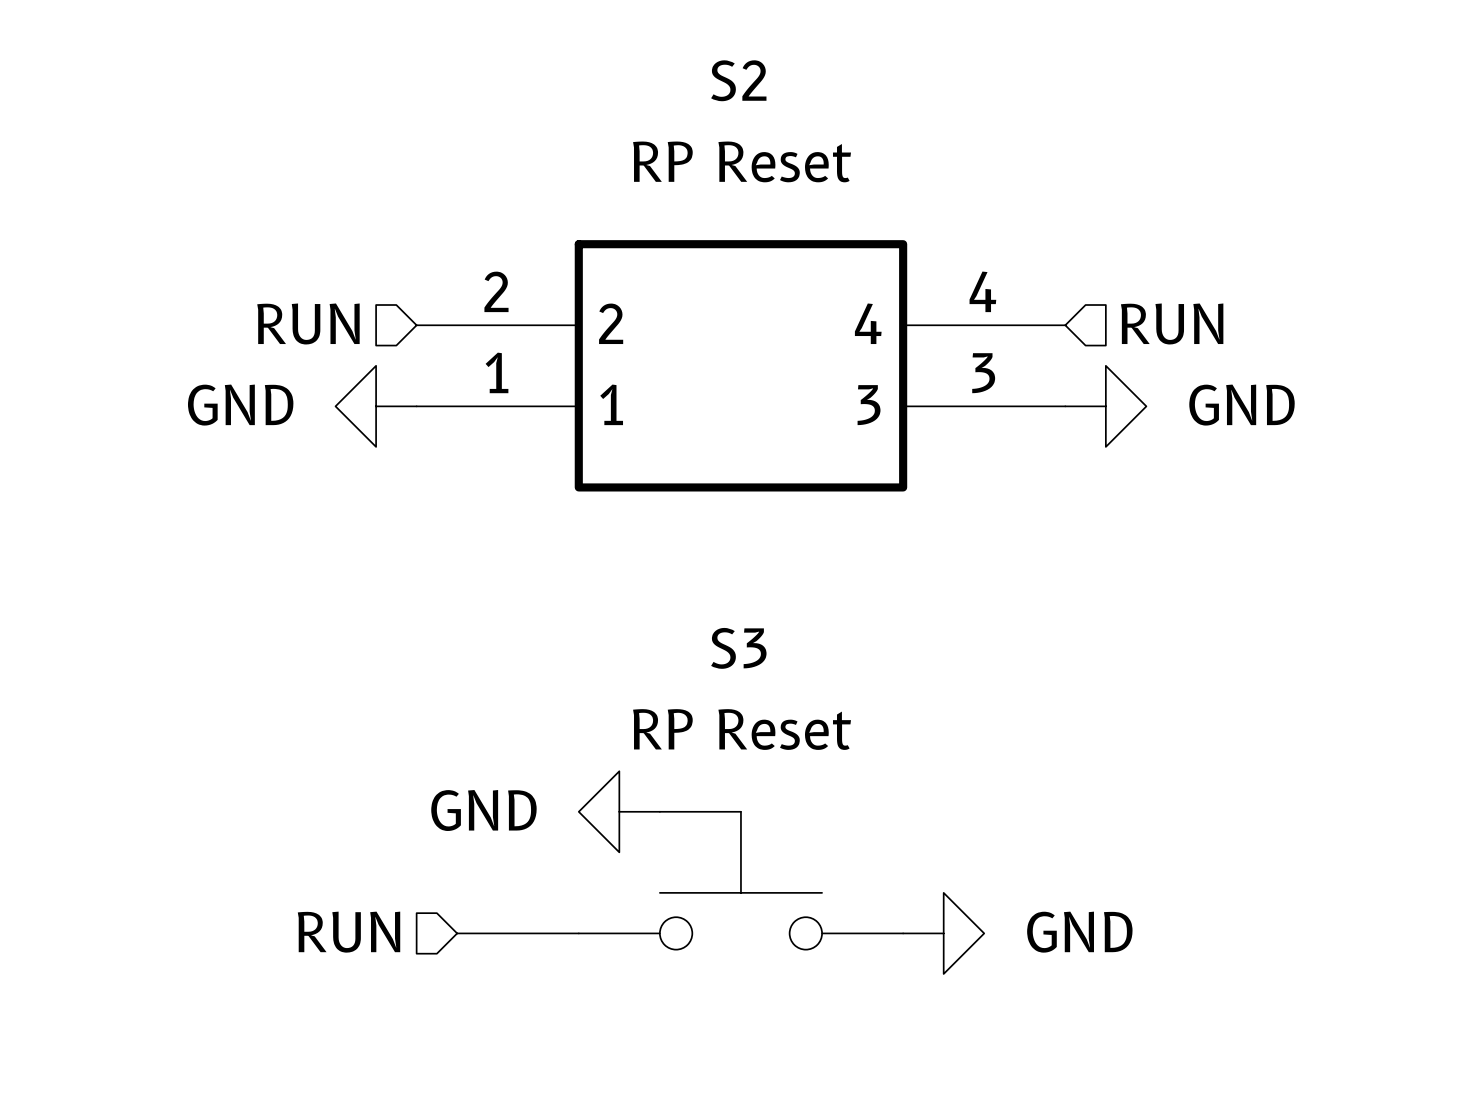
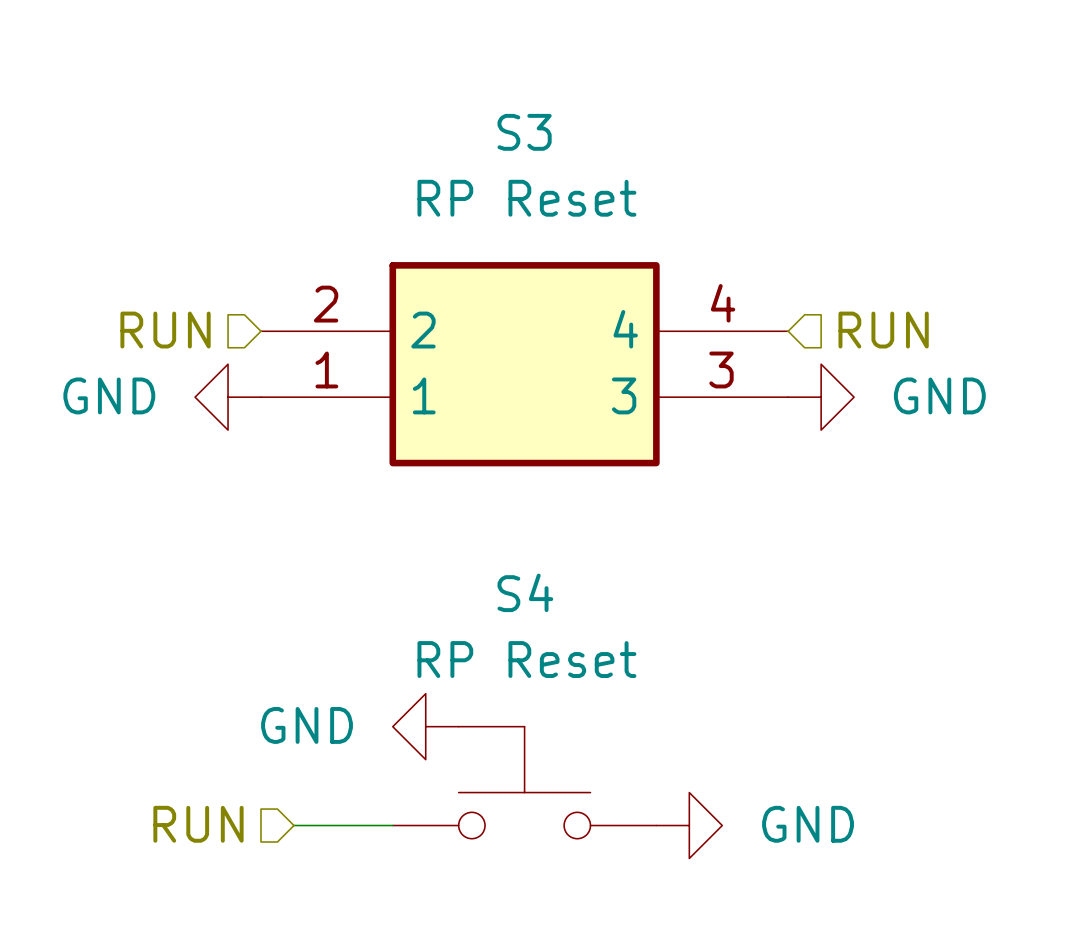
S2 name: S2 (738, 80) -> S3 (524, 132)
S3 name: S3 (738, 648) -> S4 (525, 592)

